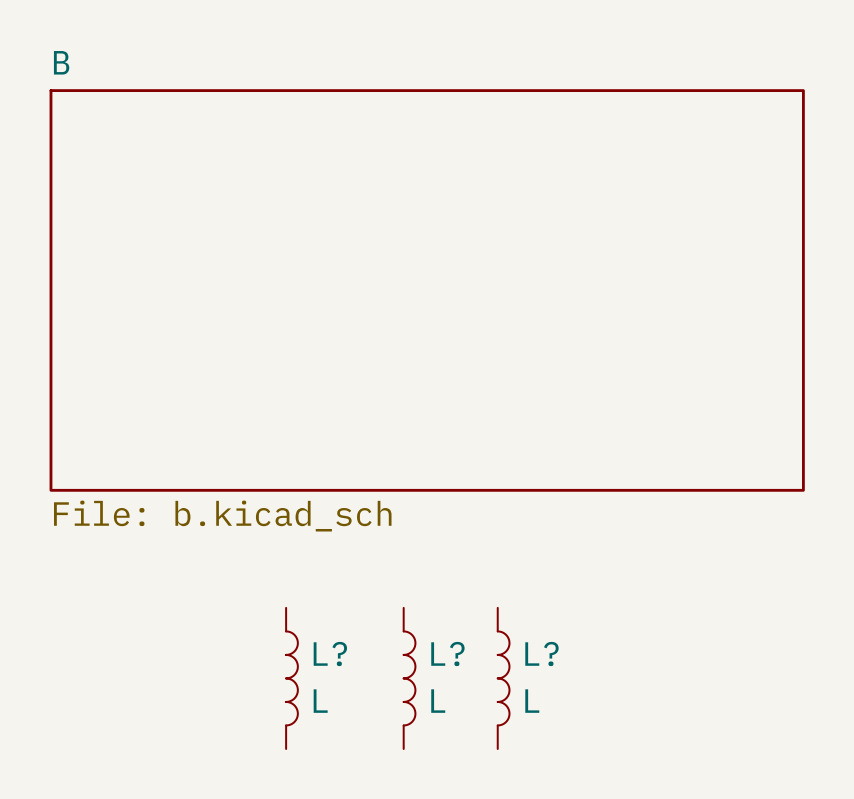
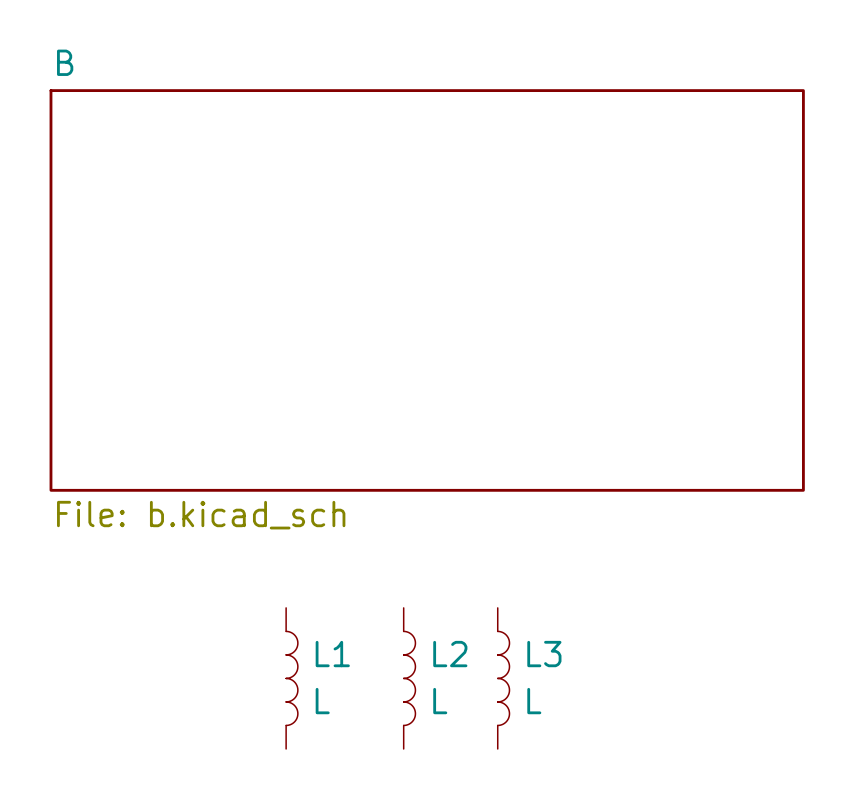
L? name: L? (330, 653) -> L1 (332, 654)
L? name: L? (447, 653) -> L2 (450, 654)
L? name: L? (541, 653) -> L3 (544, 654)

